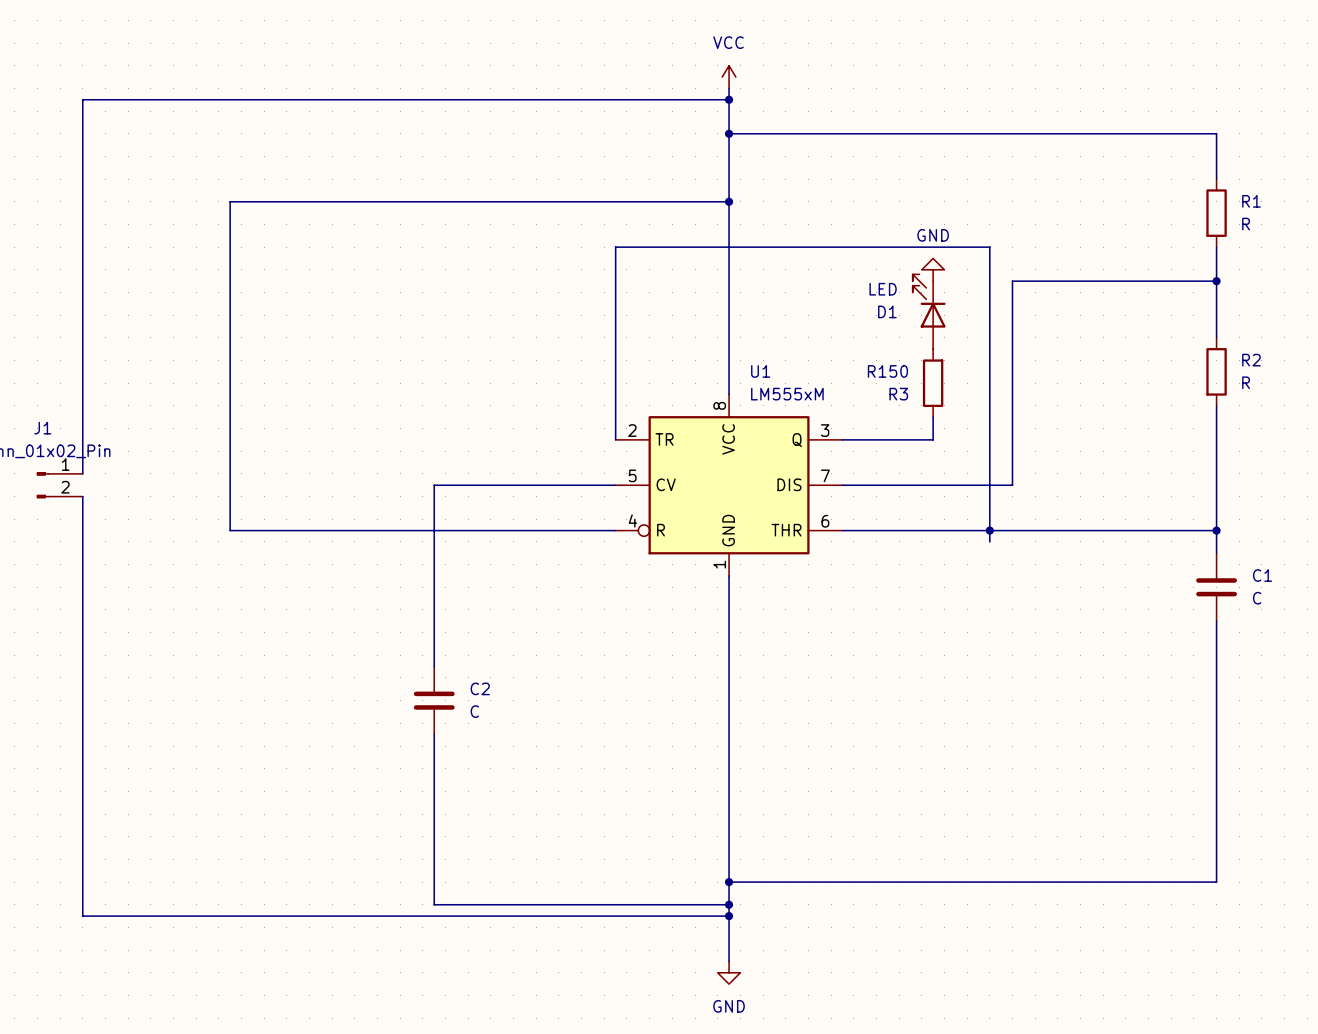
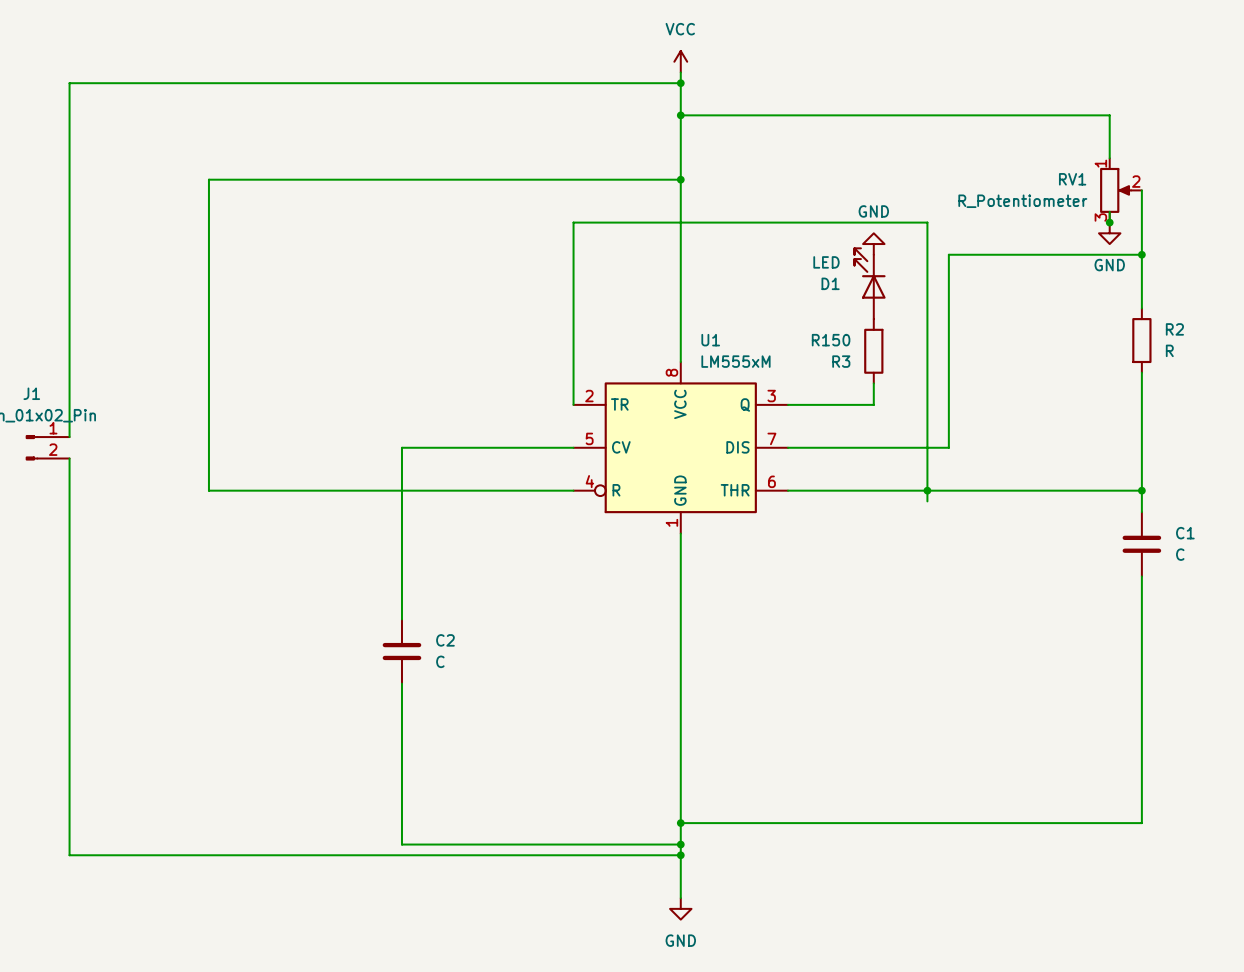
wire: (1182, 133) (1216, 133) (1216, 179) -> (1109, 115) (1109, 158)
RV1: none -> R_Potentiometer (1120, 190)
wire: none -> (1141, 190) (1141, 222)
R1: R (1216, 213) -> none
wire: none -> (1109, 211) (1109, 222)
junction: none -> (1109, 222)
power symbol: none -> GND (1109, 233)

